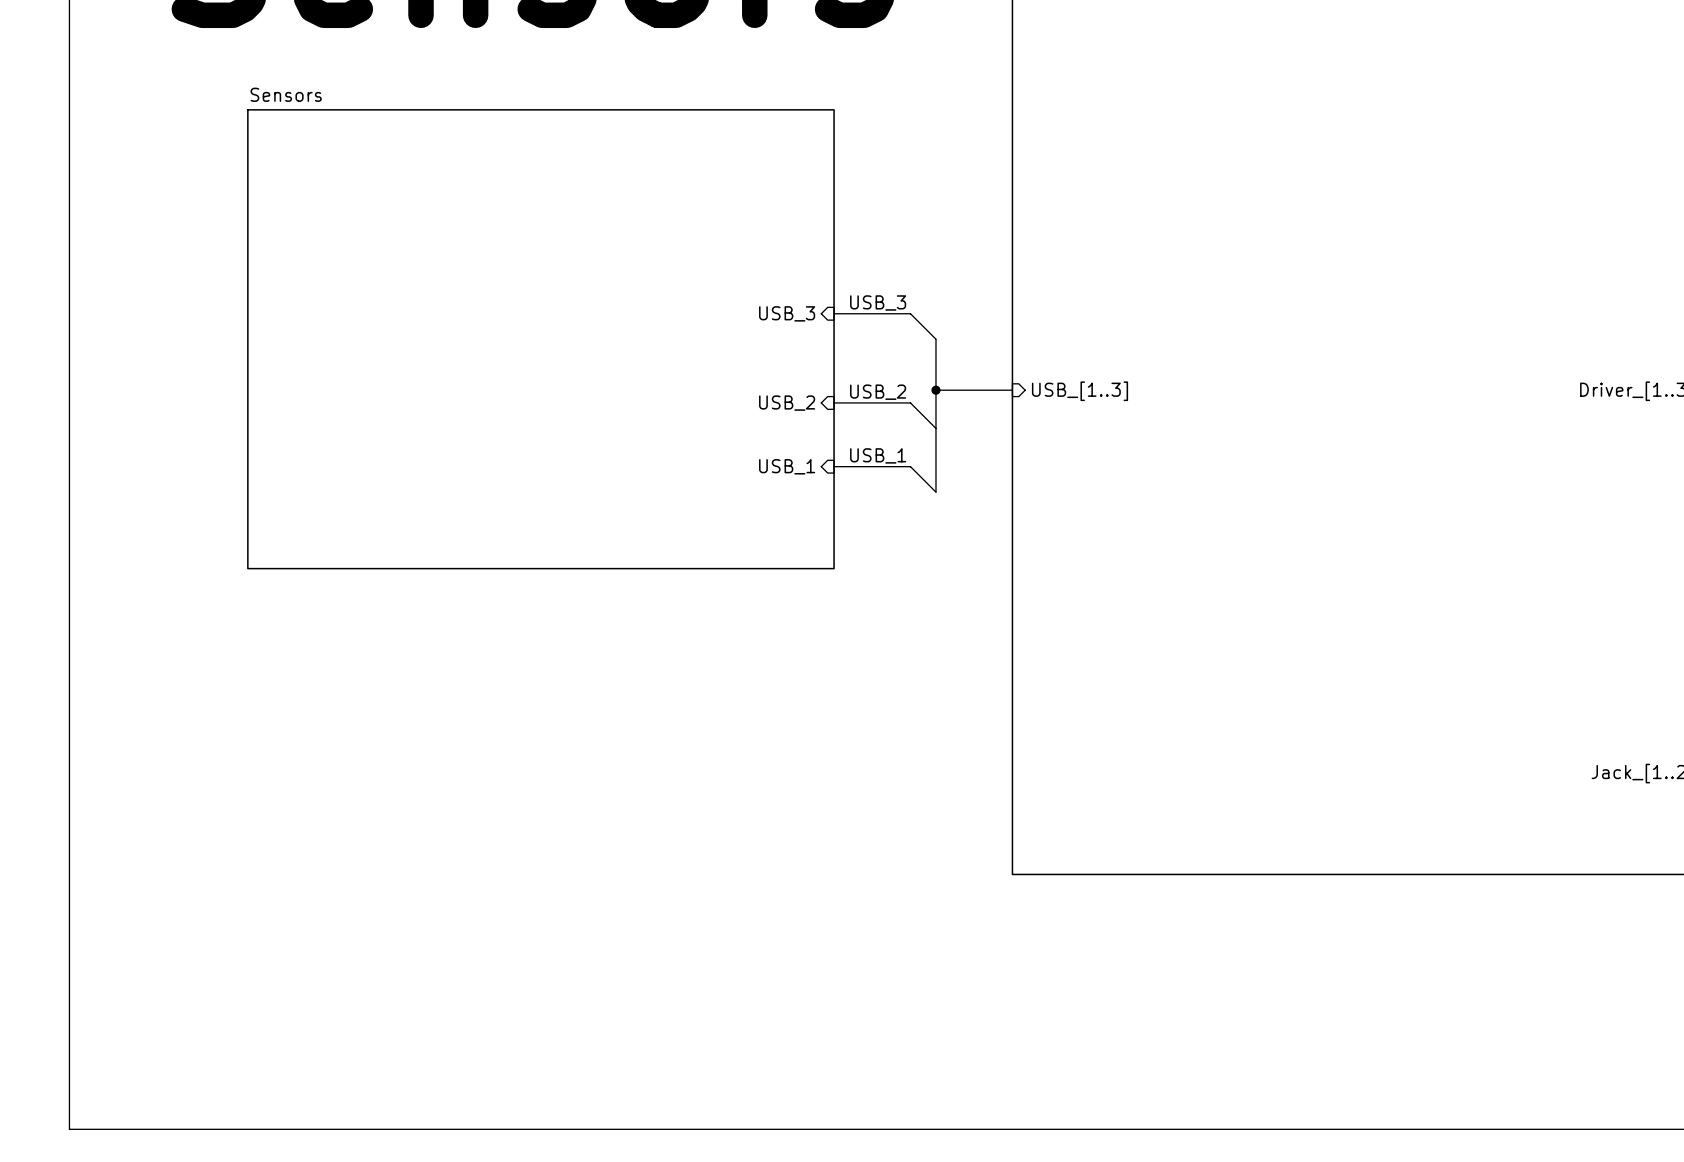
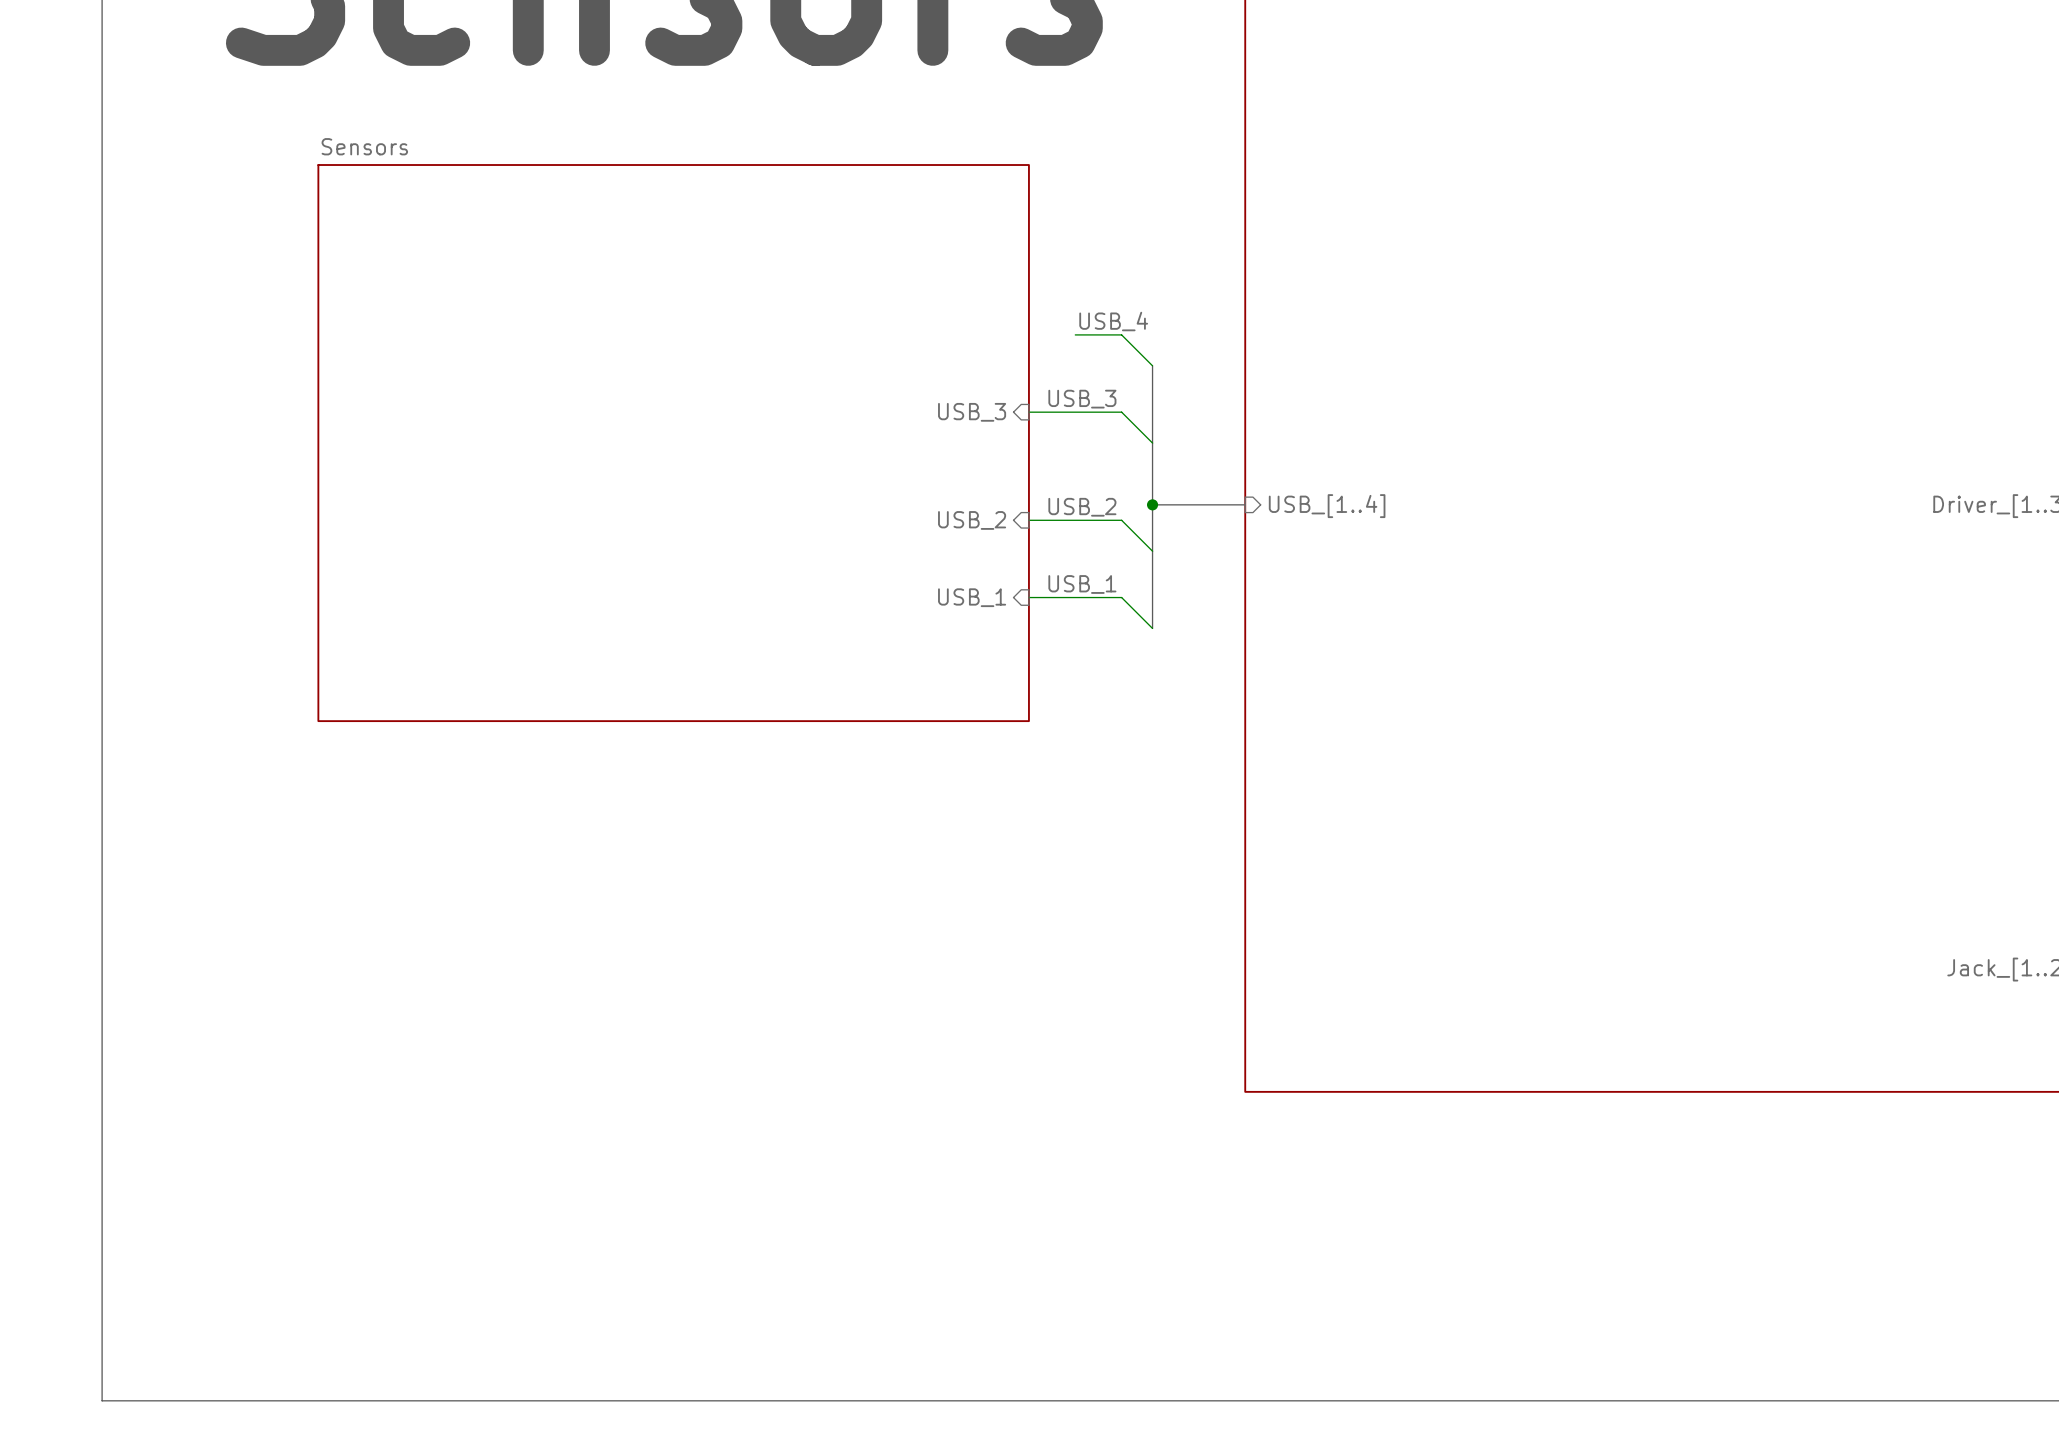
label: none -> USB_4 (1113, 321)
wire: none -> (1075, 334) (1121, 334) (1152, 365)
bus: none -> (1152, 365) (1152, 443)
sheet pin: USB_[1..3] (1080, 391) -> USB_[1..4] (1327, 506)

